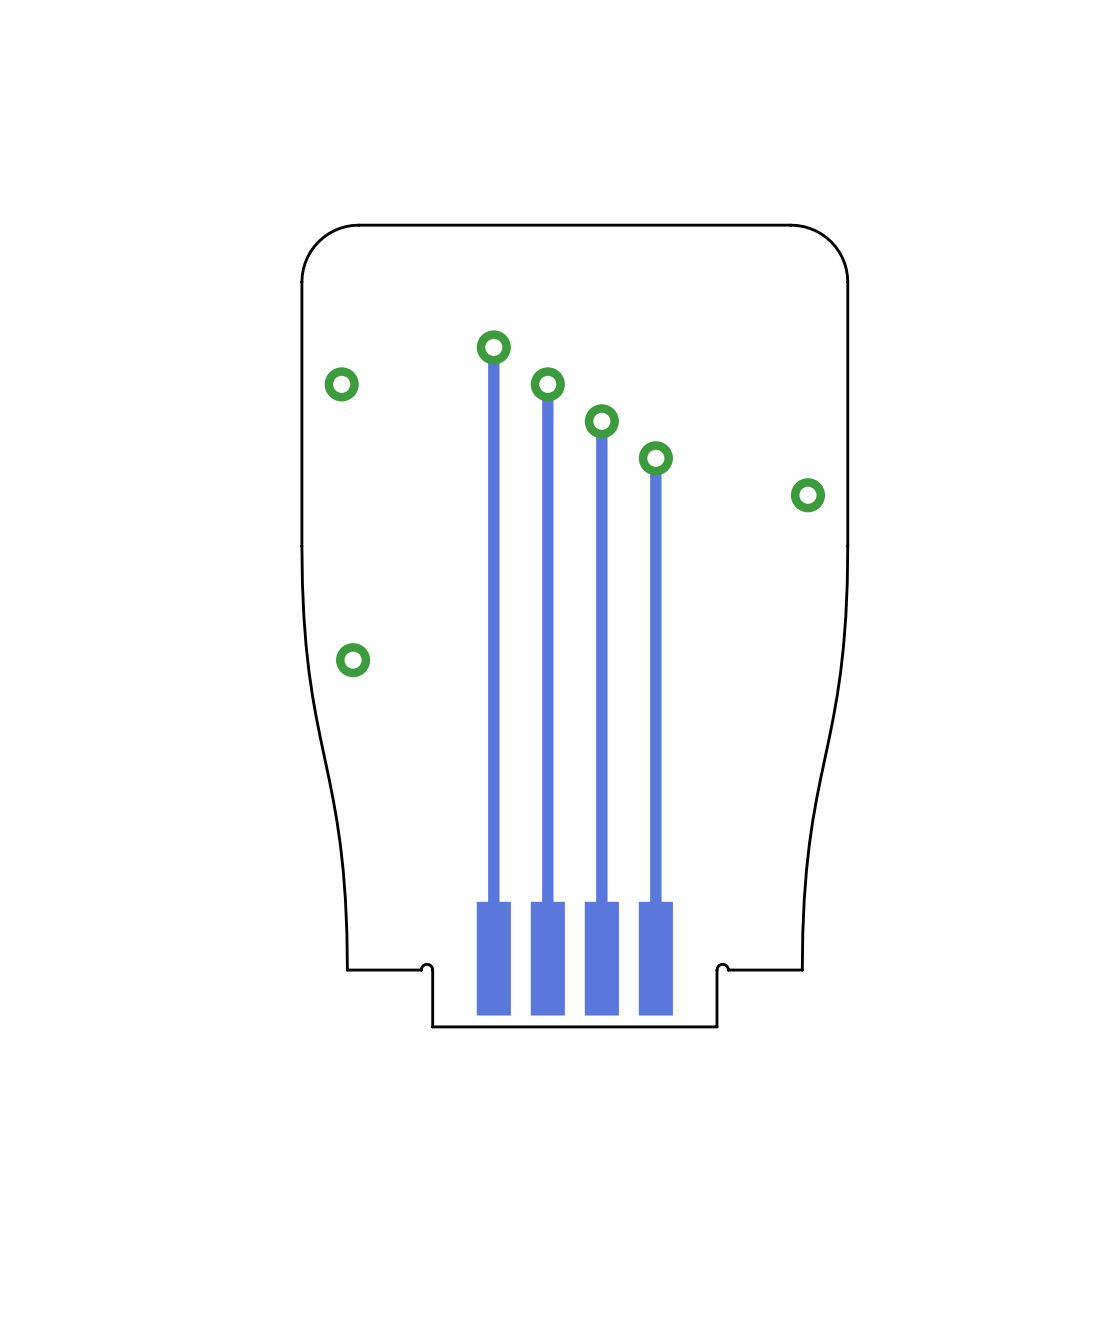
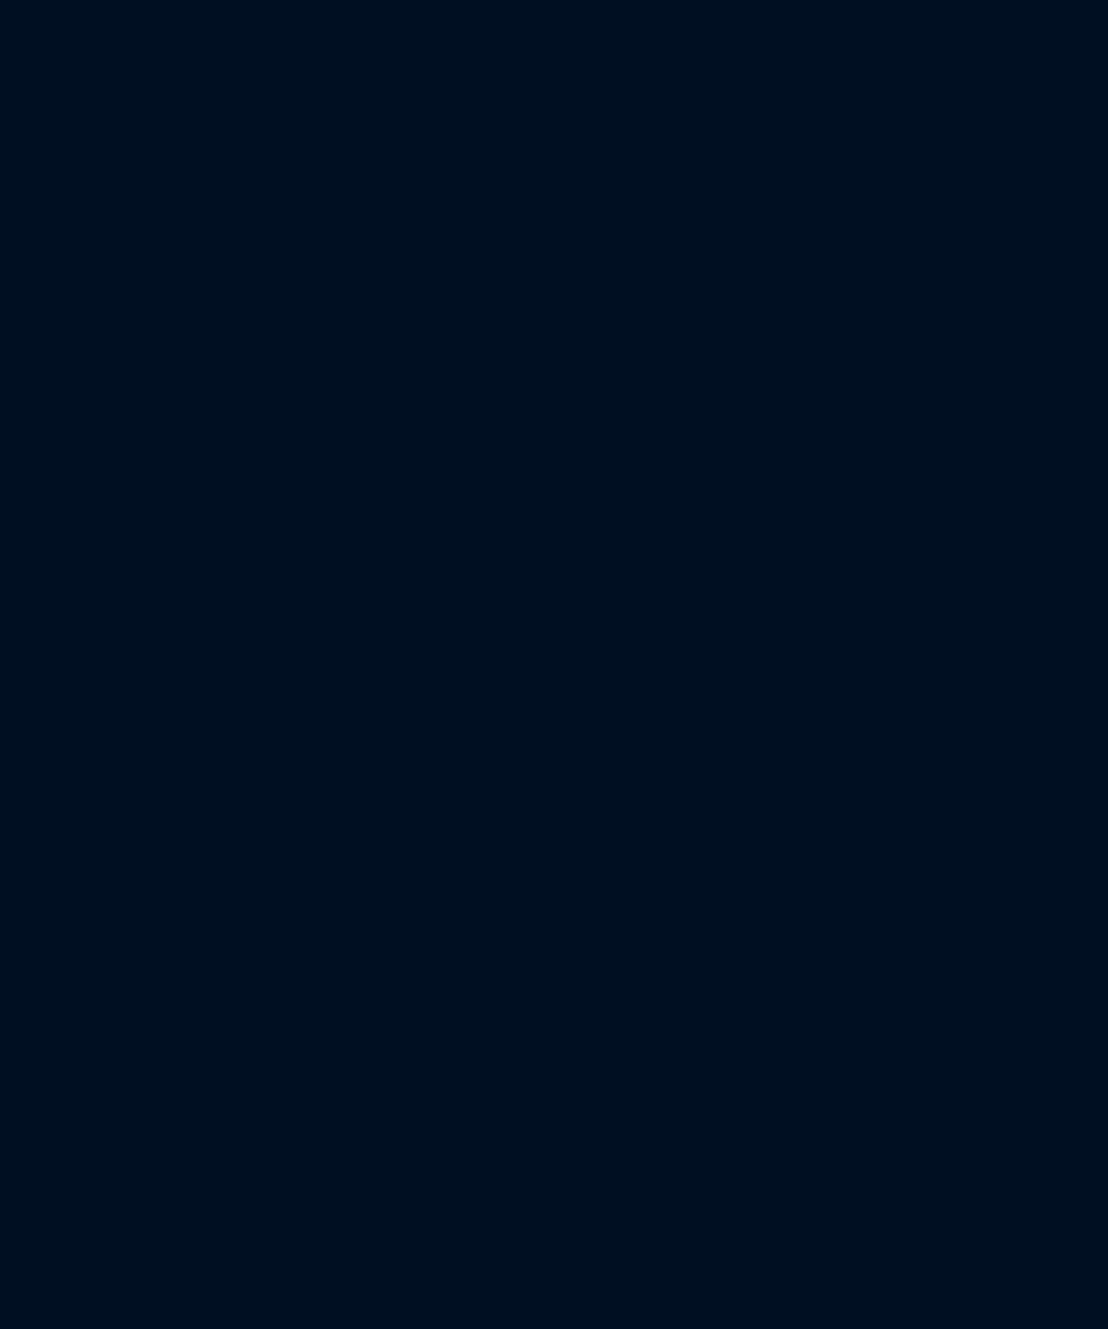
board edge: (790, 225) (352, 225) (339, 228) (323, 237) (307, 257) (301, 282) (301, 545) (303, 616) (312, 695) (340, 844) (345, 899) (347, 970) (421, 970) (424, 965) (430, 965) (432, 970) (432, 1026) (716, 1026) (716, 970) (719, 965) (725, 965) (728, 970) (802, 970) (804, 899) (809, 844) (837, 695) (845, 616) (847, 545) (847, 282) (844, 263) (831, 241) (809, 228) (790, 225) -> none
track: (493, 347) (493, 958) -> none
via: (493, 347) -> none
via: (341, 384) -> none
track: (547, 384) (547, 958) -> none
via: (547, 384) -> none
track: (601, 421) (601, 958) -> none
via: (601, 421) -> none
track: (655, 458) (655, 958) -> none
via: (655, 458) -> none
via: (807, 495) -> none
via: (353, 660) -> none
part: (574, 958) -> none

